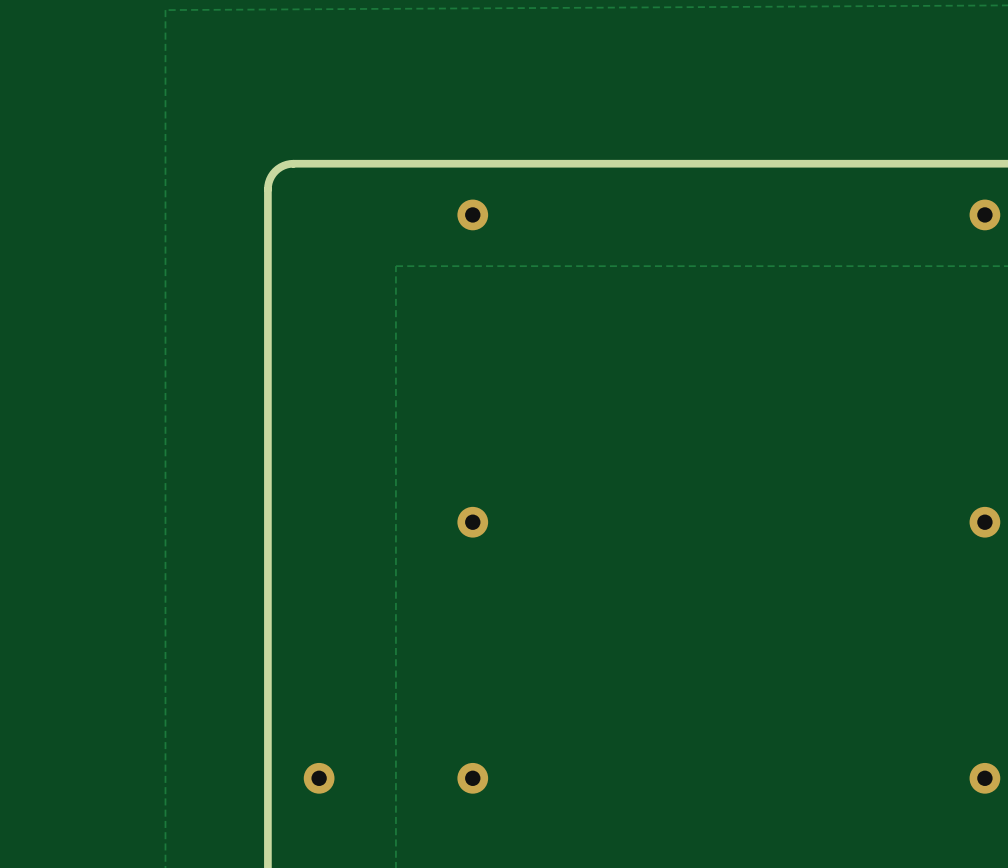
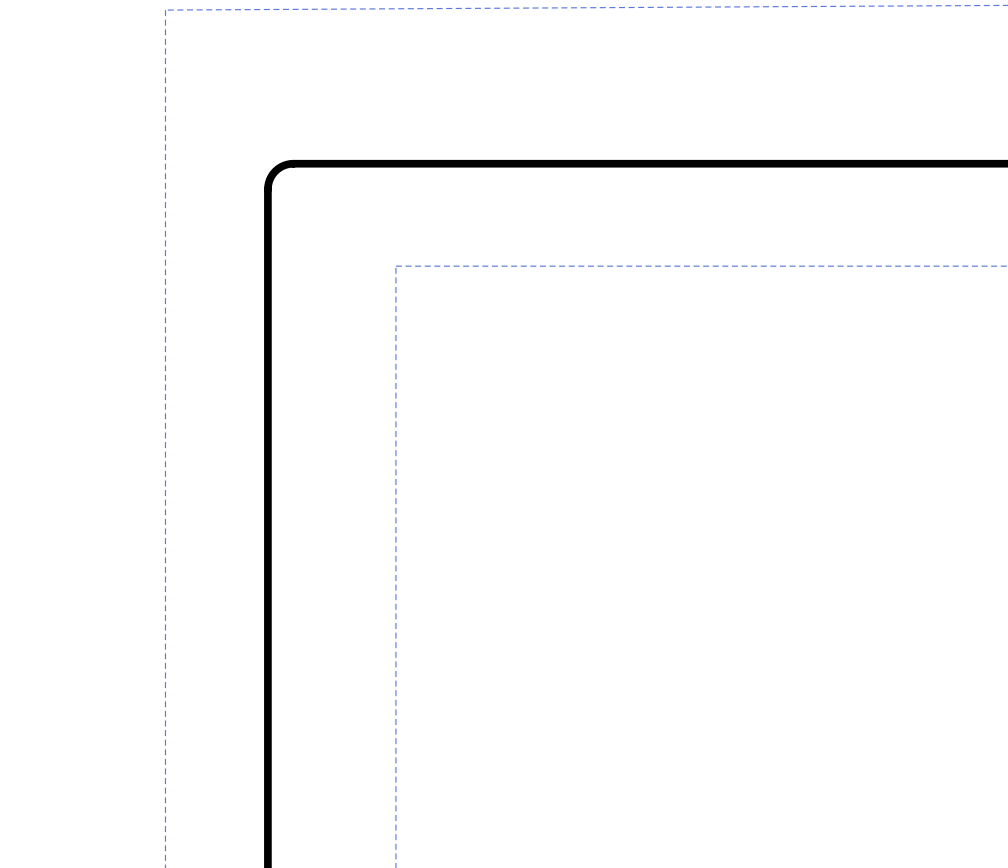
via: (472, 214) -> none
via: (984, 214) -> none
via: (472, 522) -> none
via: (984, 522) -> none
via: (319, 778) -> none
via: (472, 778) -> none
via: (984, 778) -> none

